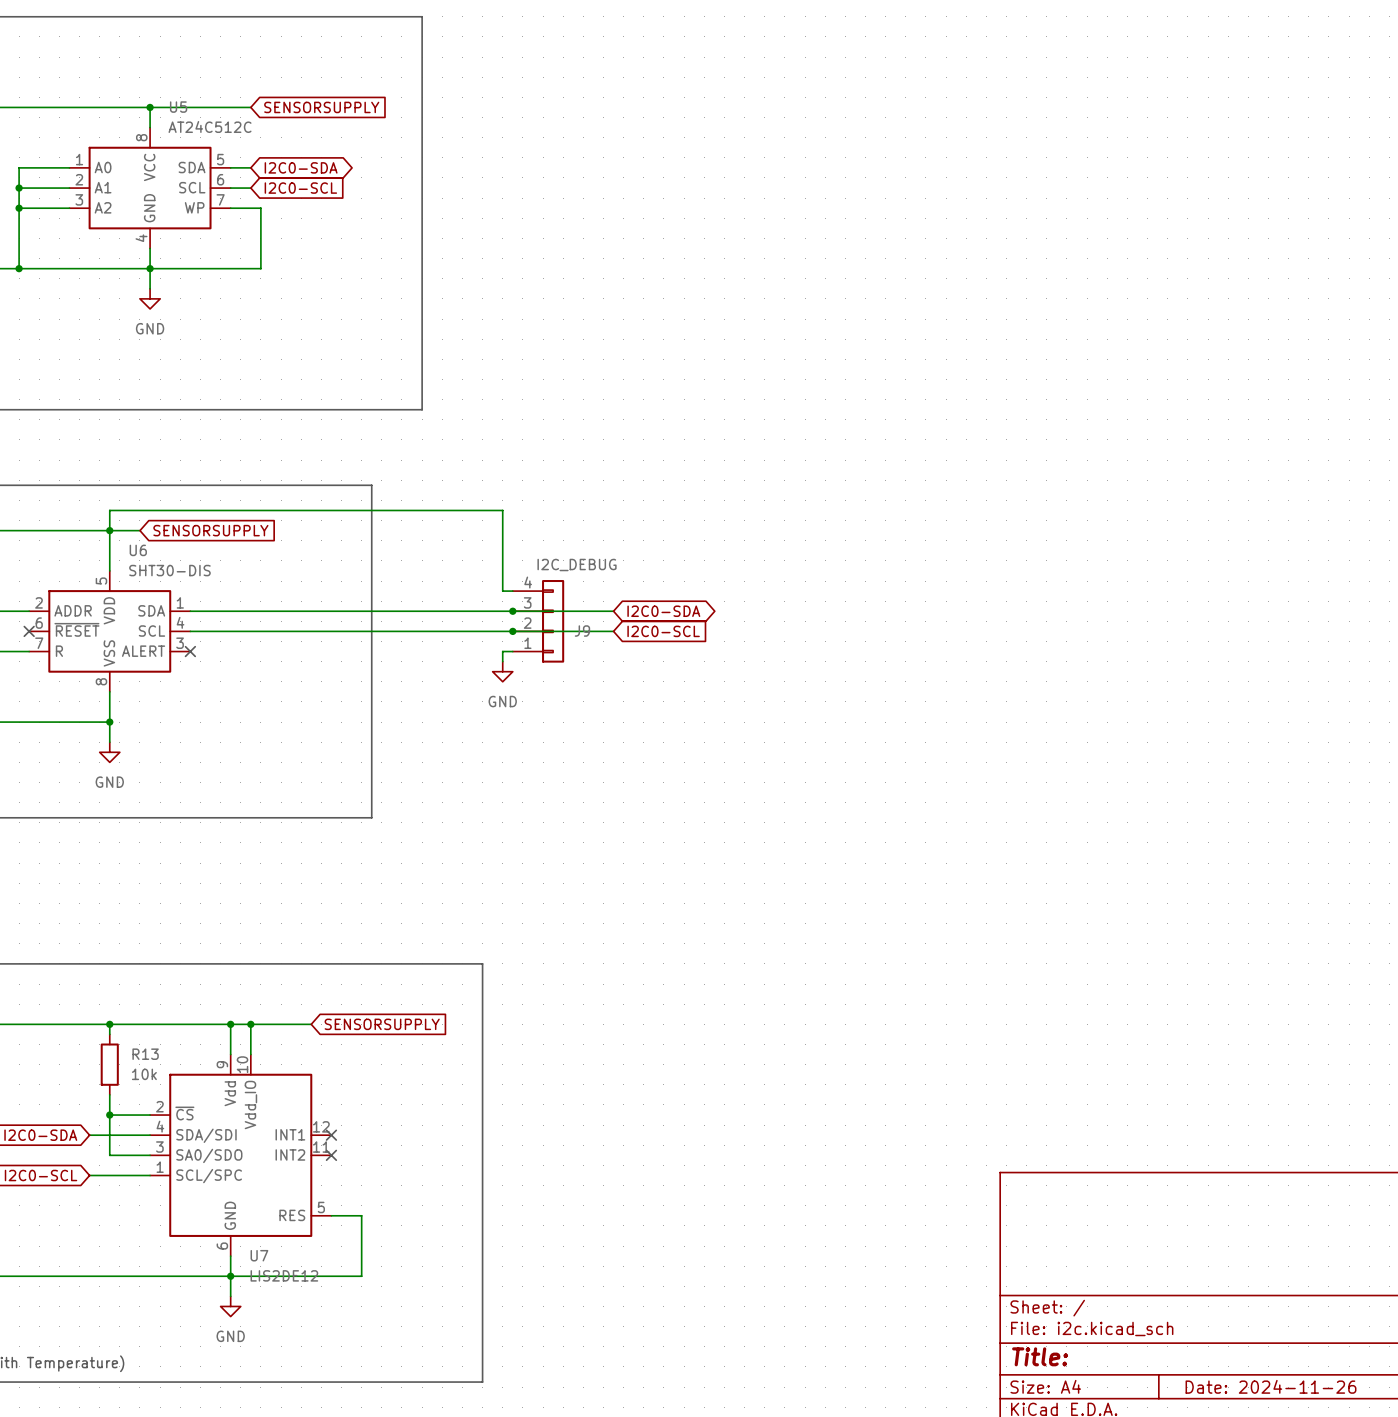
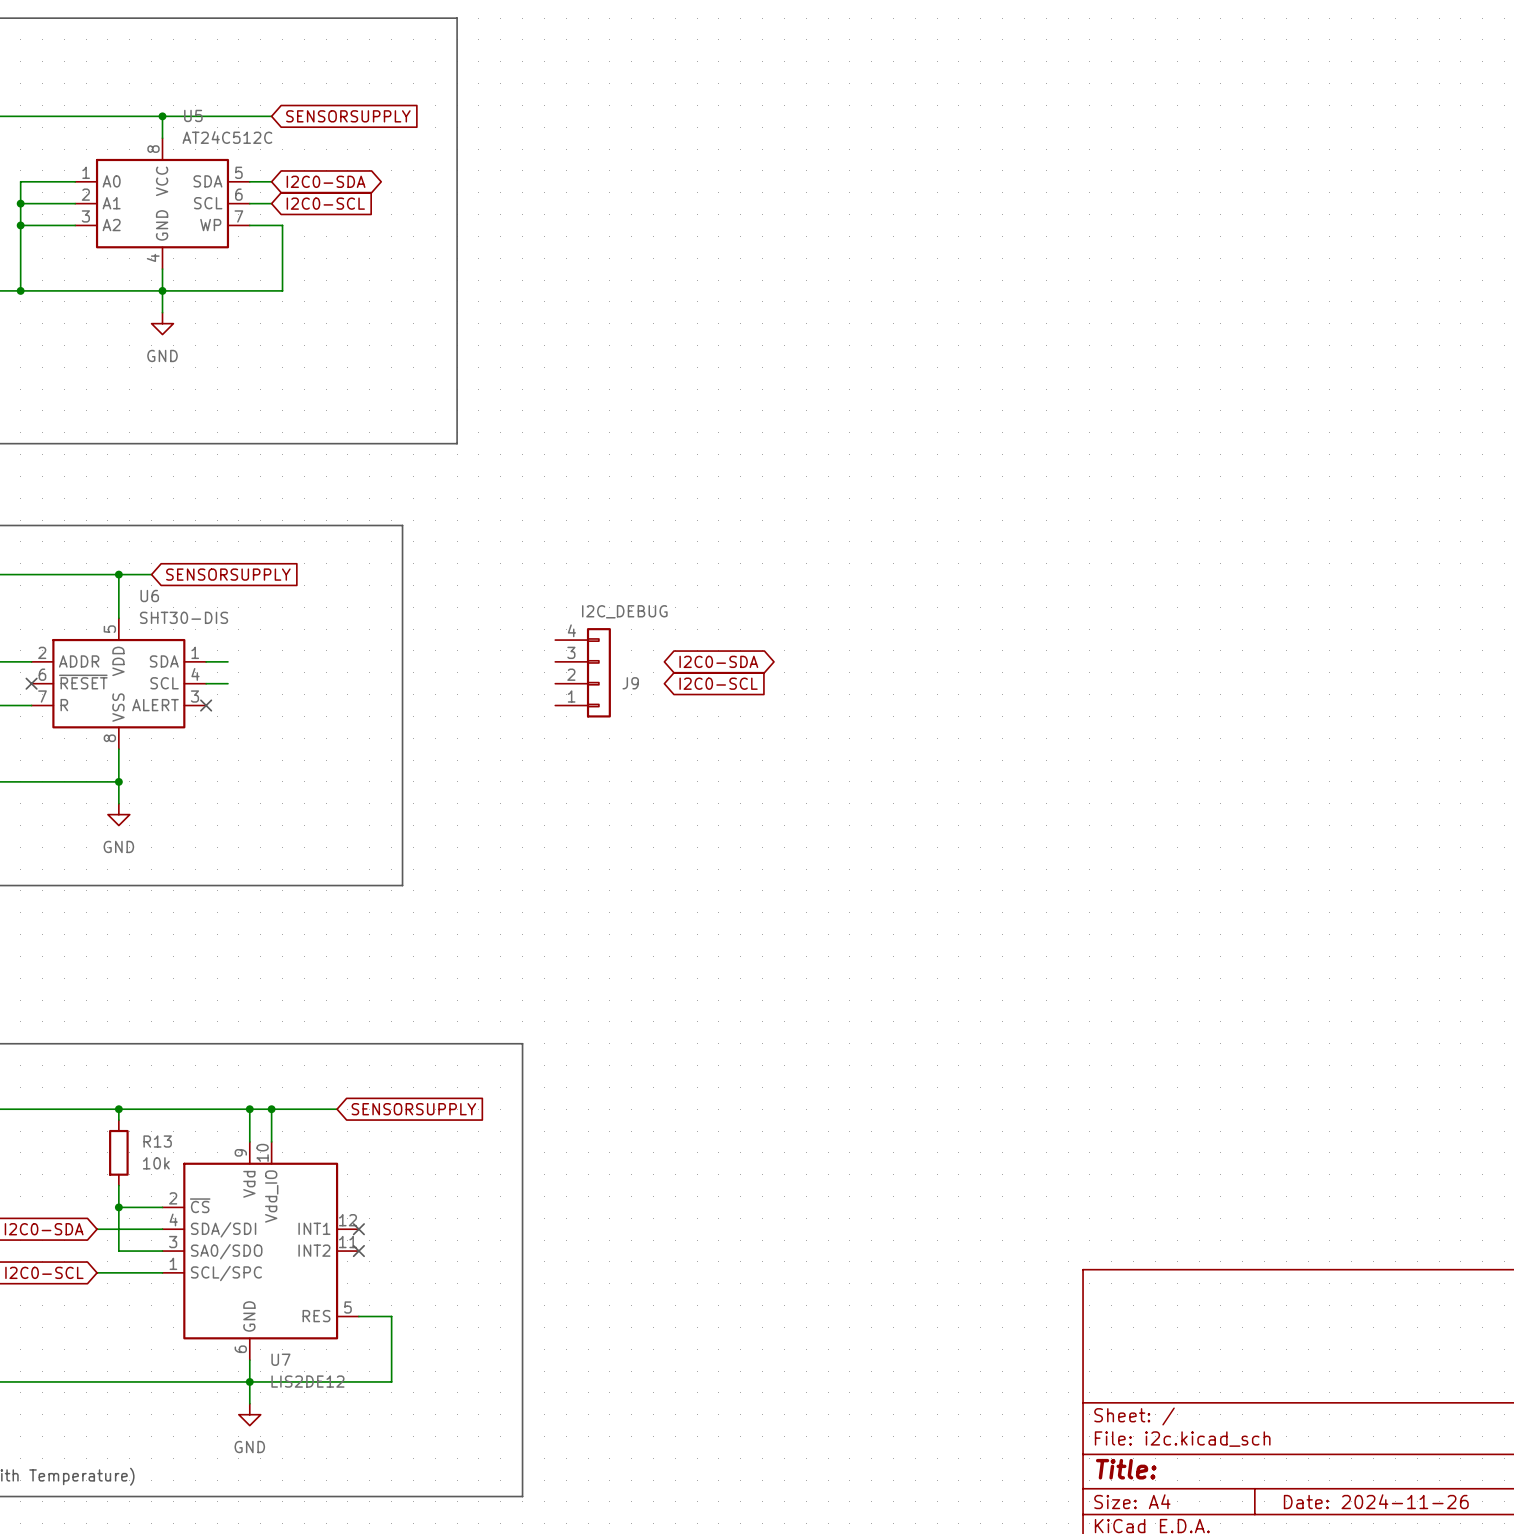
wire: (109, 530) (109, 510) (502, 510) (502, 591) (512, 591) -> none
wire: (210, 611) (613, 611) -> none
junction: (512, 611) -> none
wire: (210, 631) (613, 631) -> none
junction: (512, 631) -> none
wire: (512, 651) (502, 651) (502, 661) -> none
power symbol: GND (502, 671) -> none

